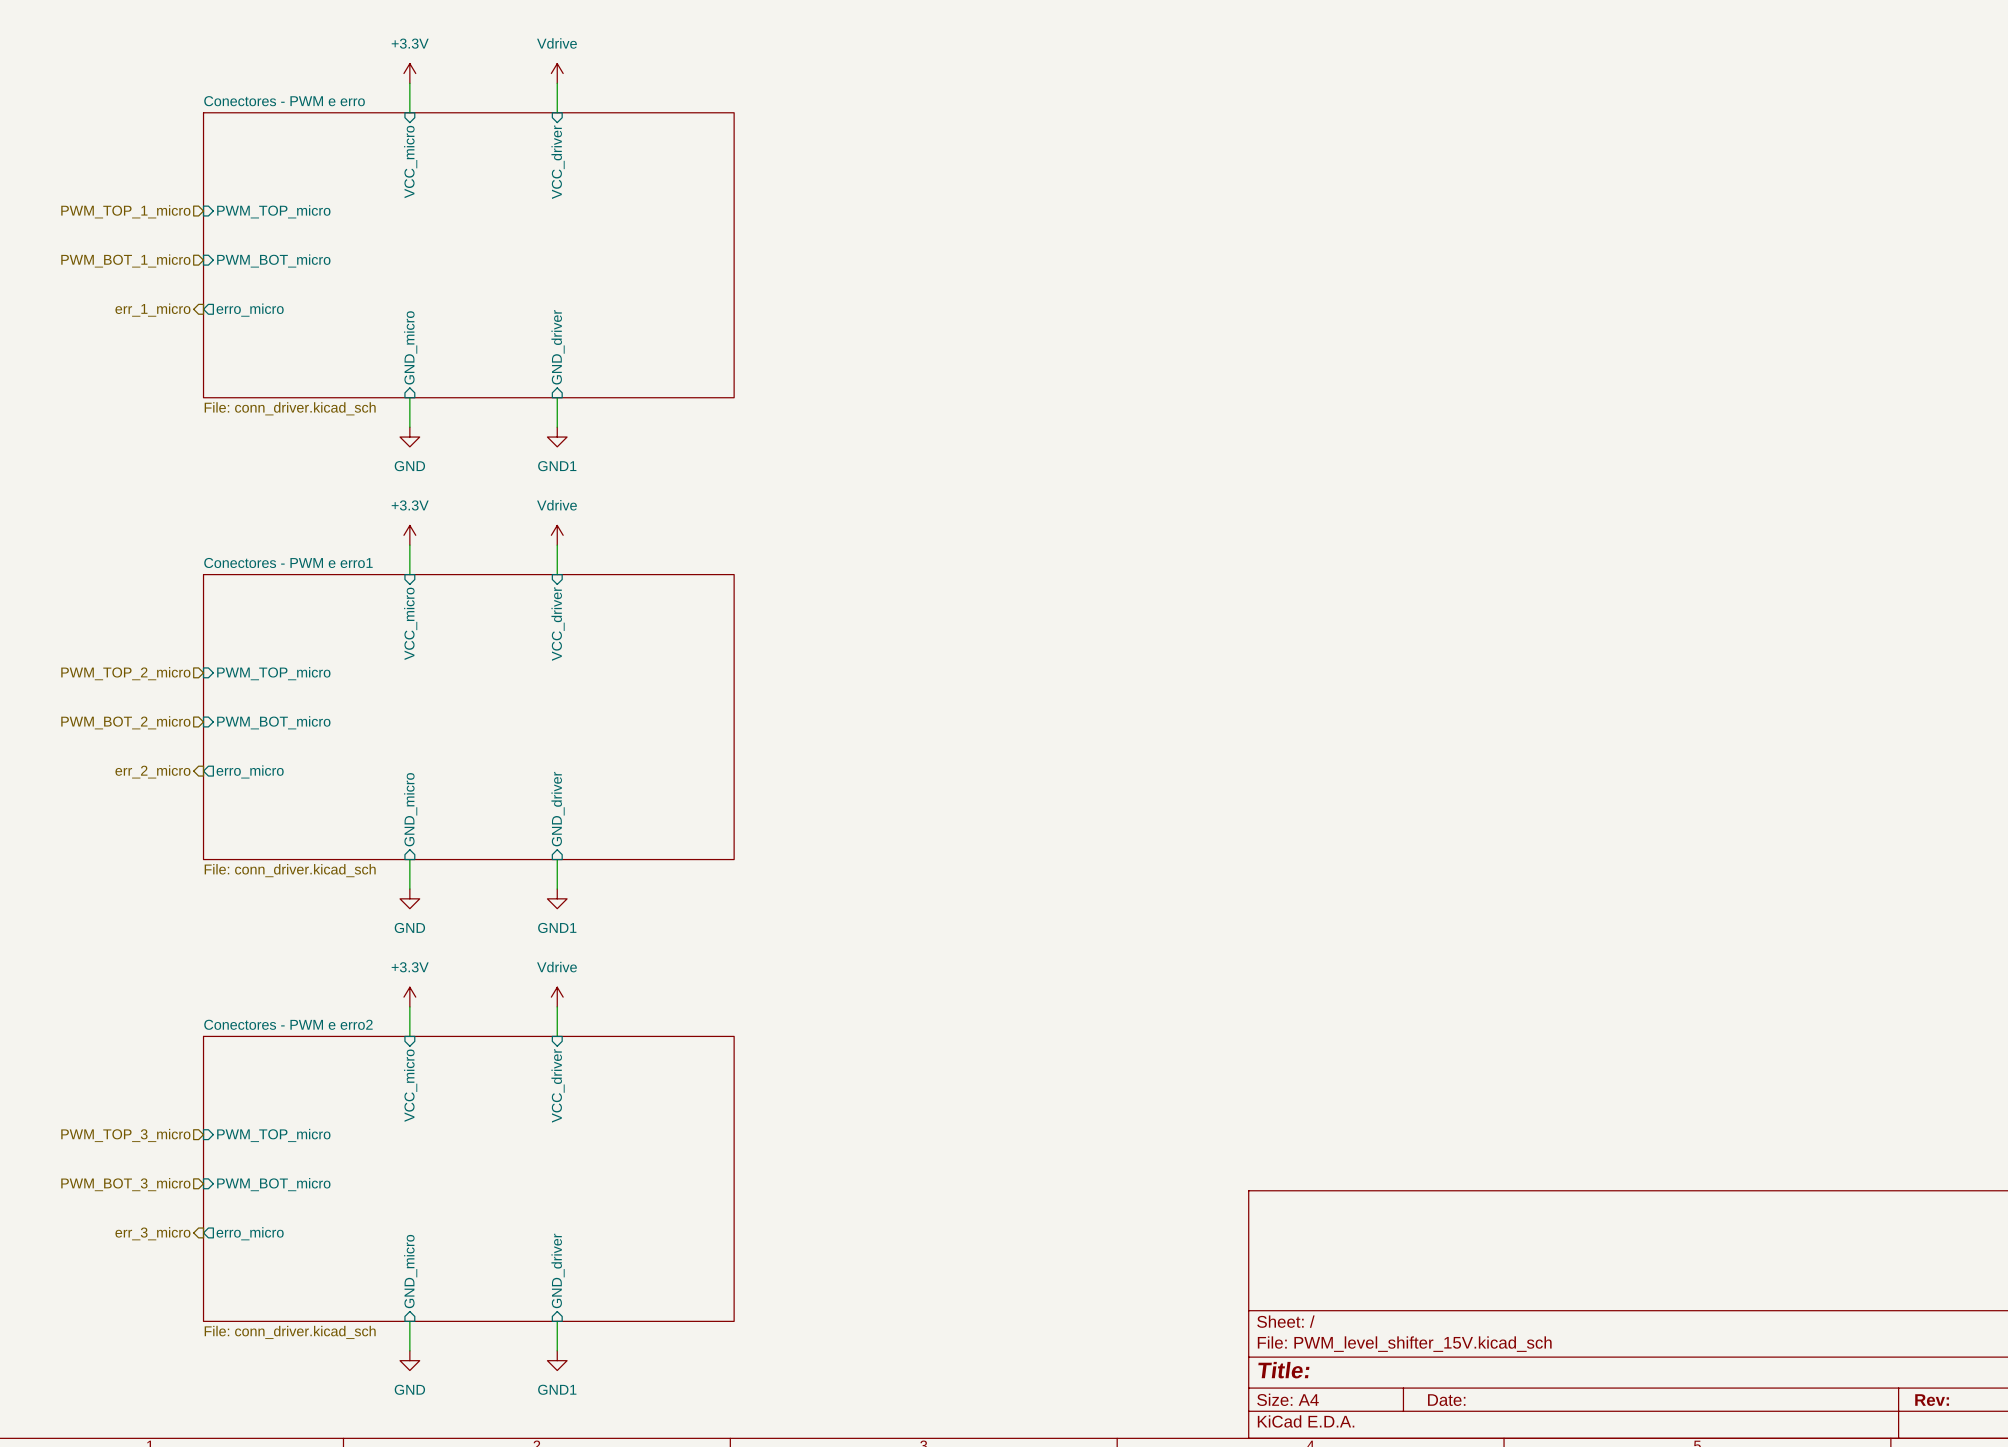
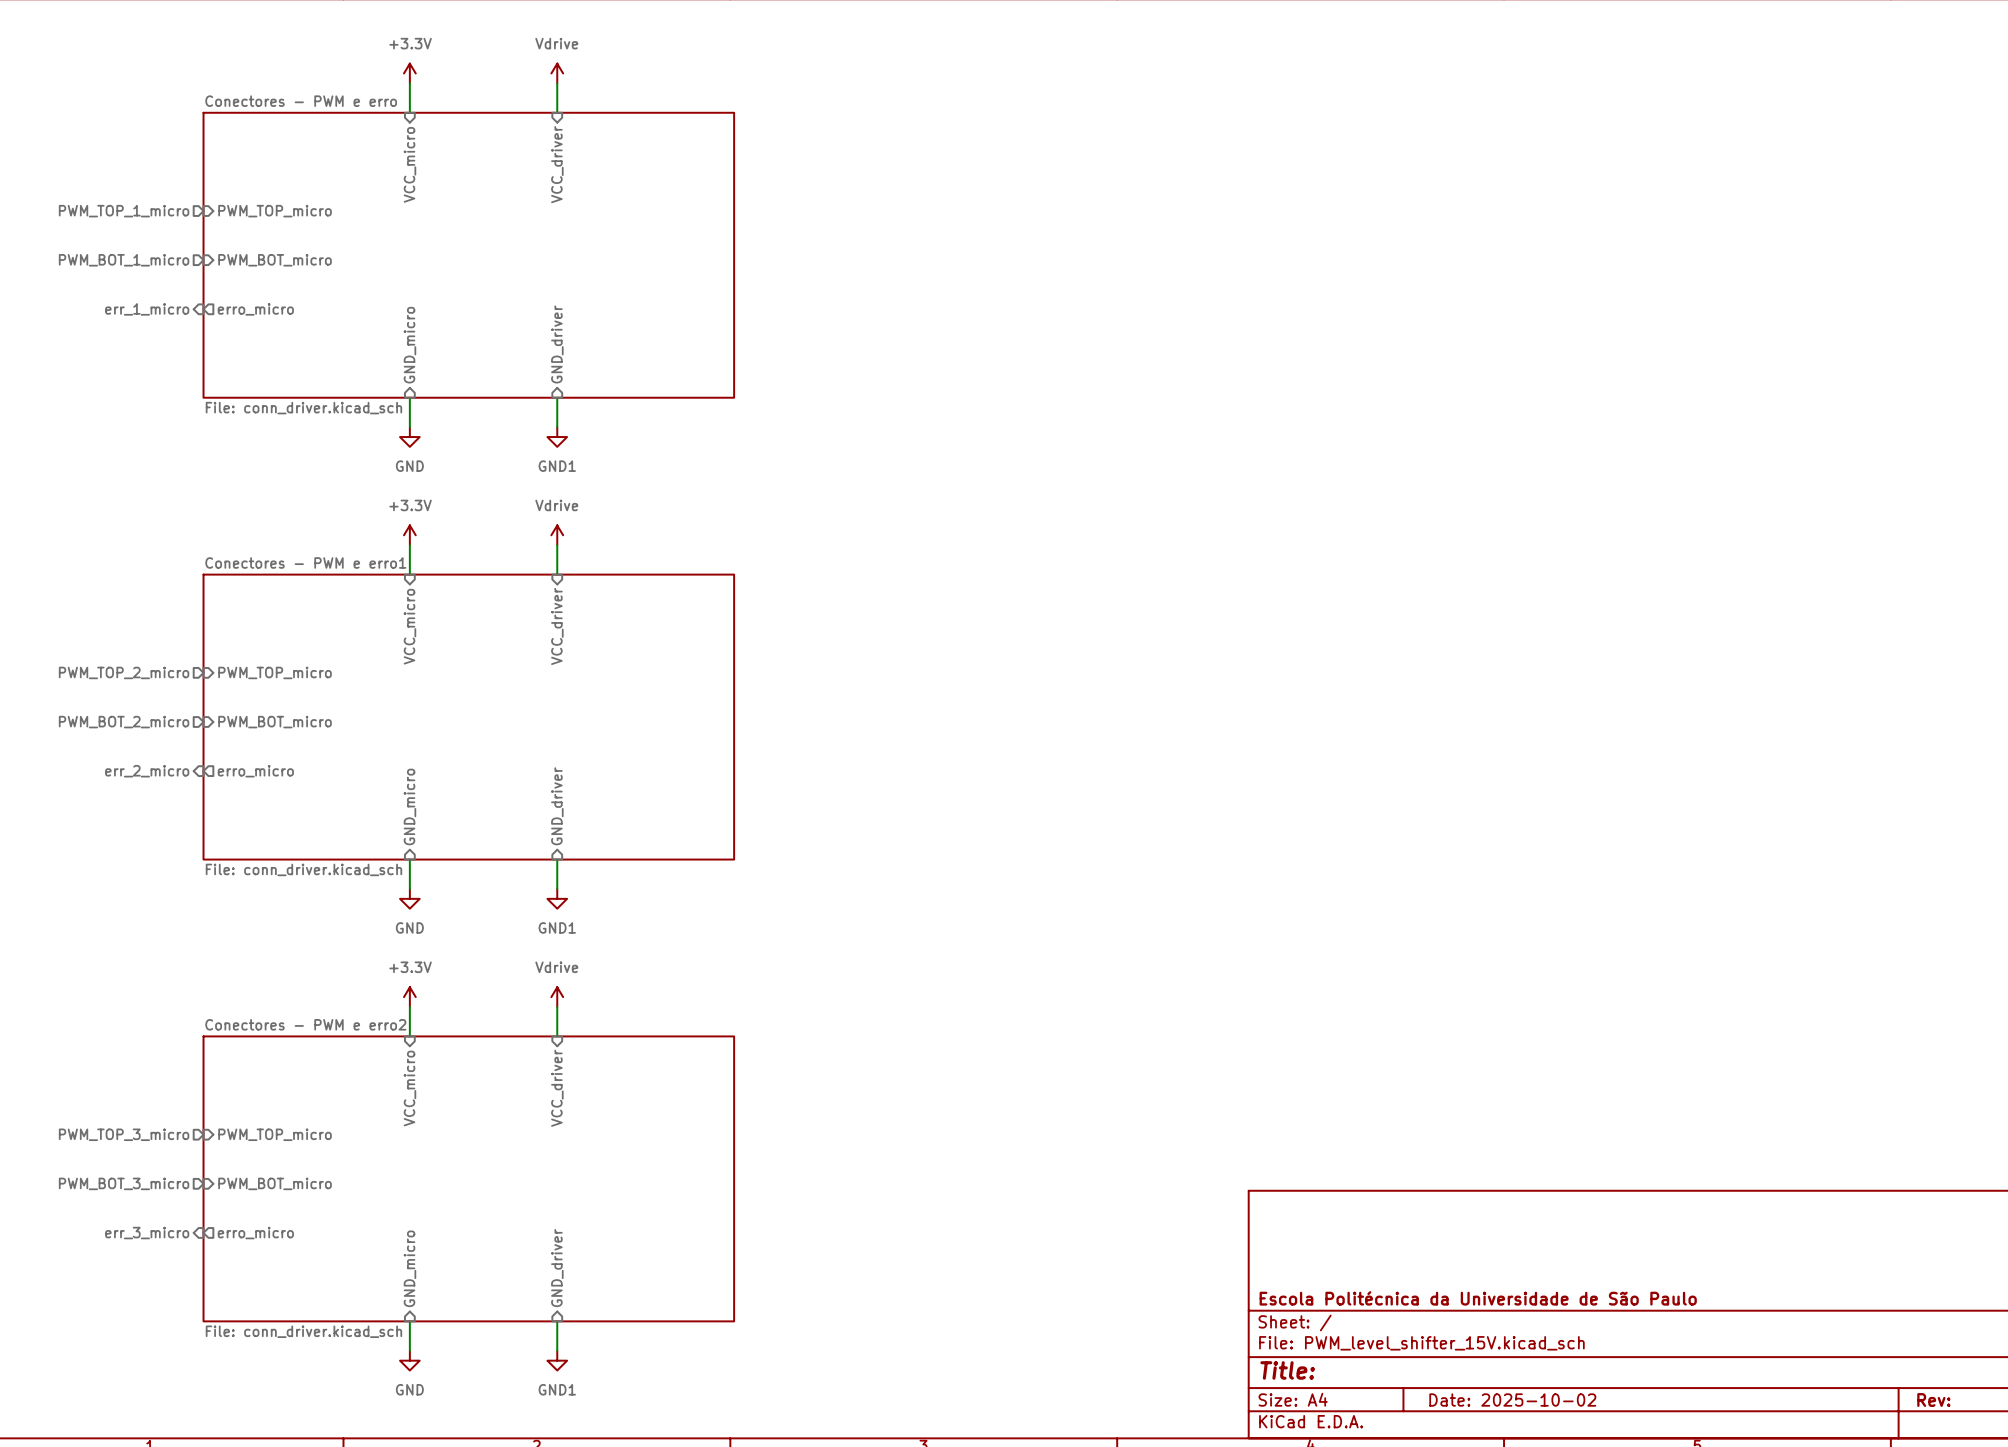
title block: none -> Escola Politécnica da Universidade de São Paulo (1478, 1298)
title block: Date: (1446, 1400) -> Date: 2025-10-02 (1512, 1400)

